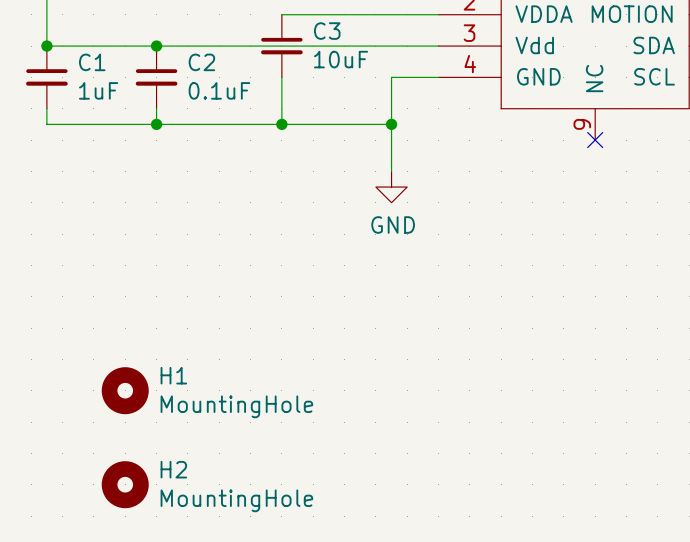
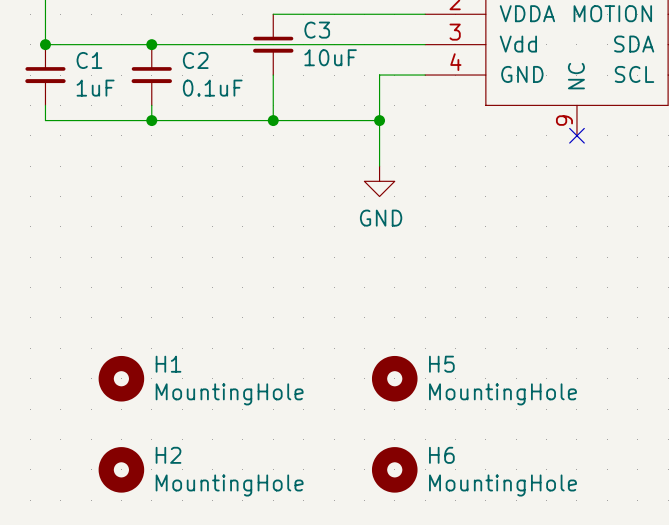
H5: none -> MountingHole (394, 378)
H6: none -> MountingHole (394, 469)

